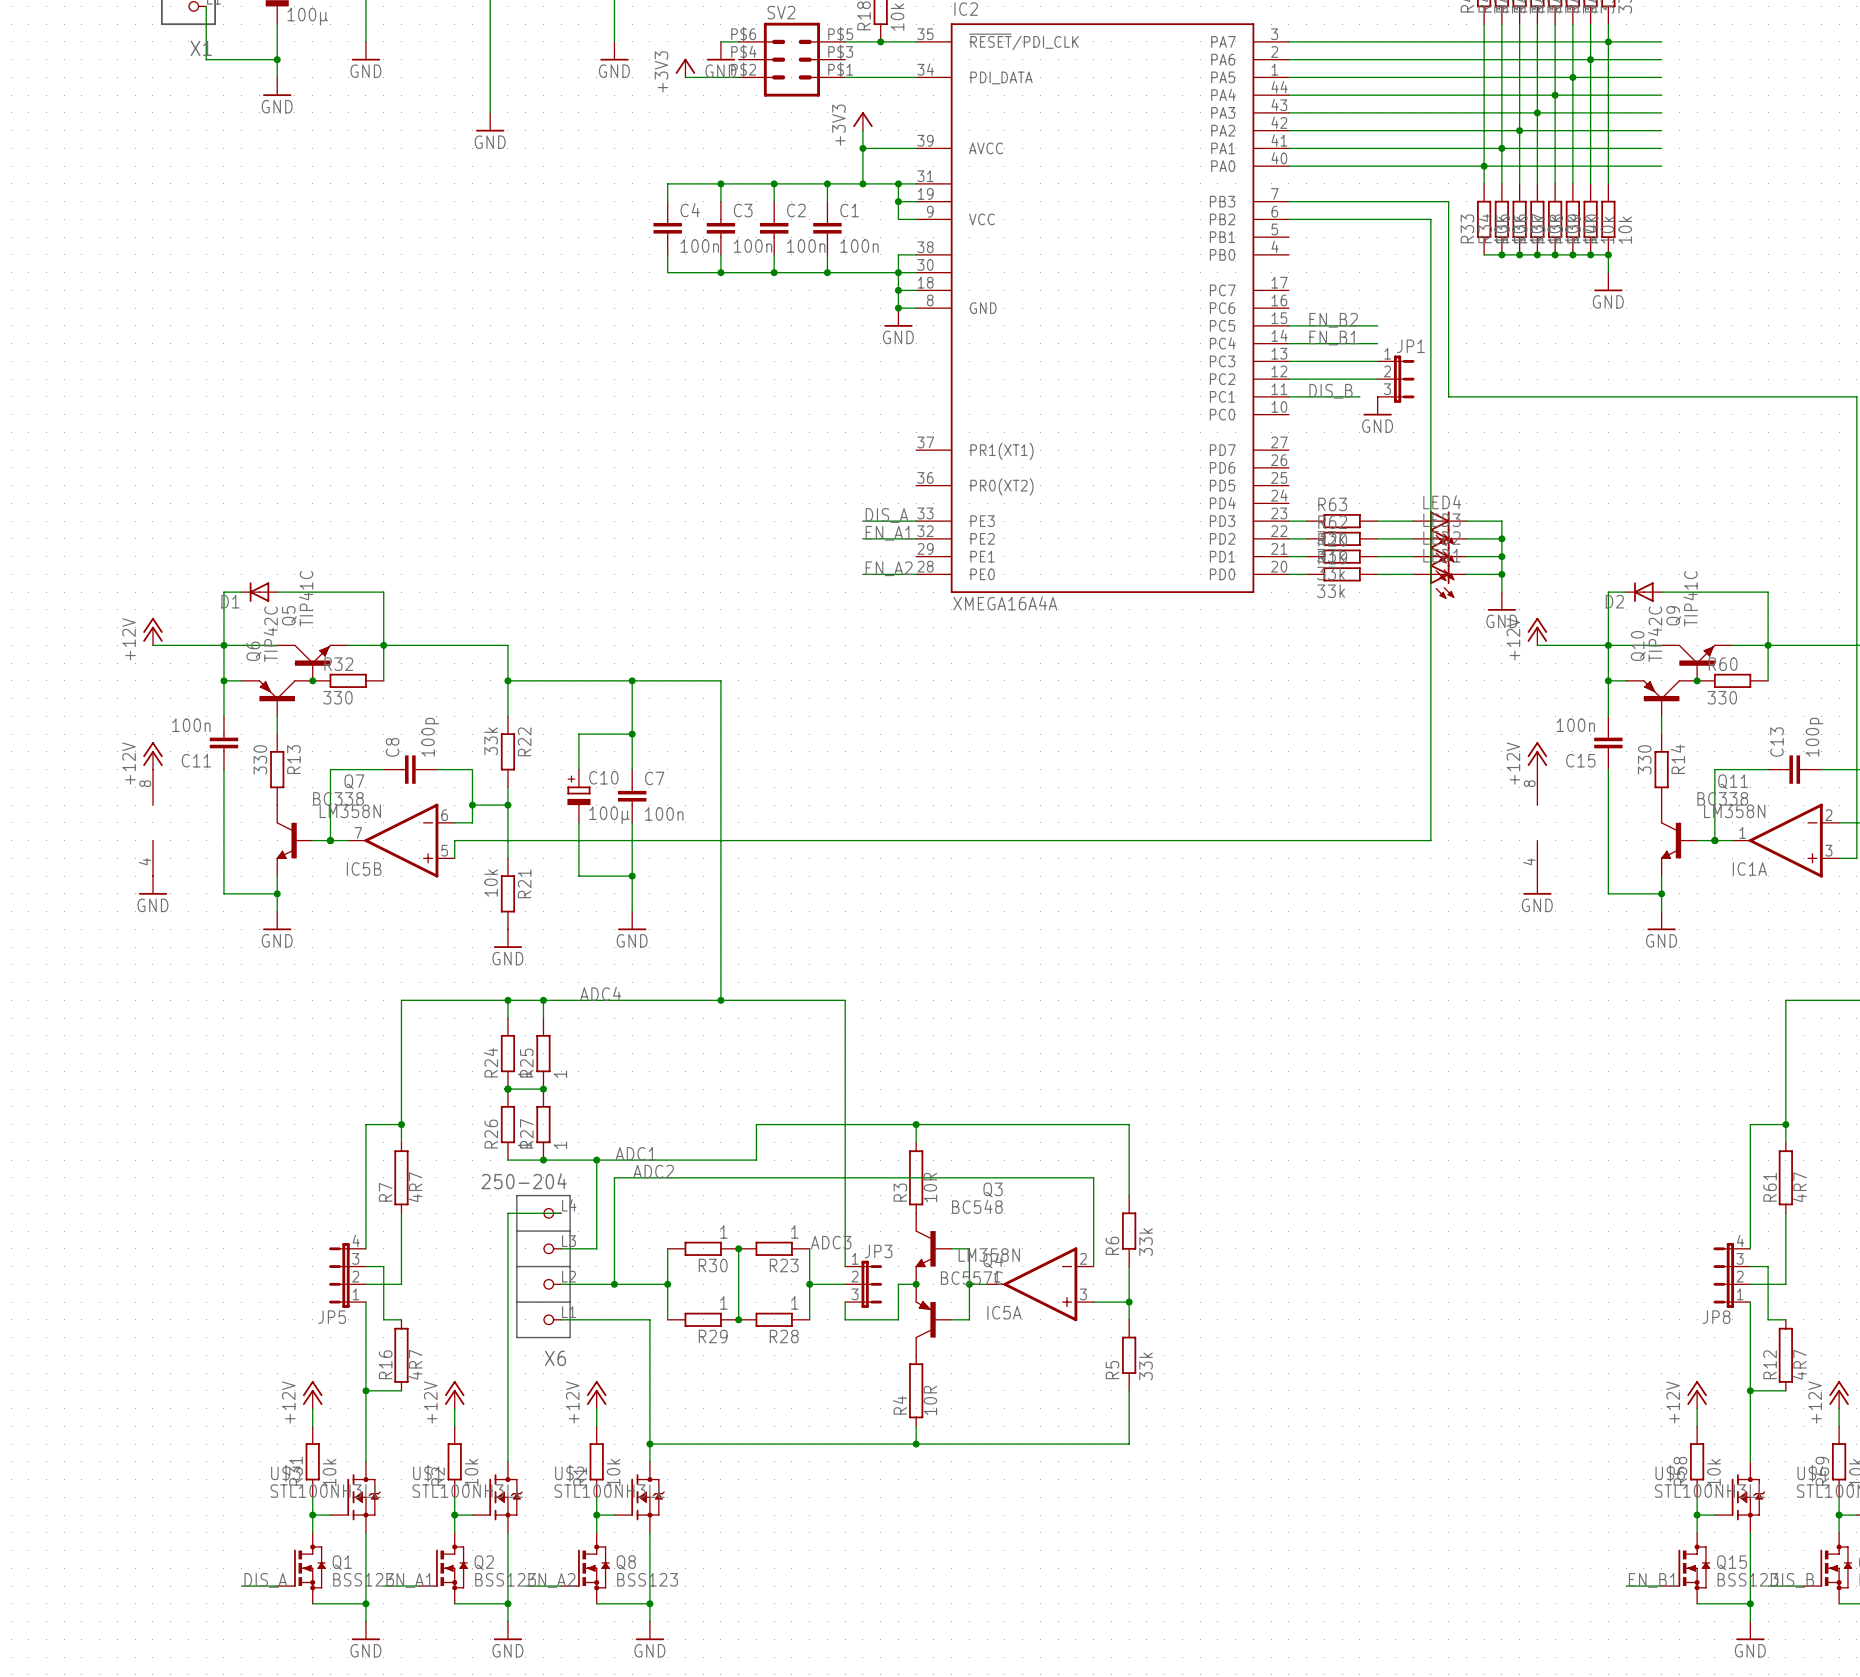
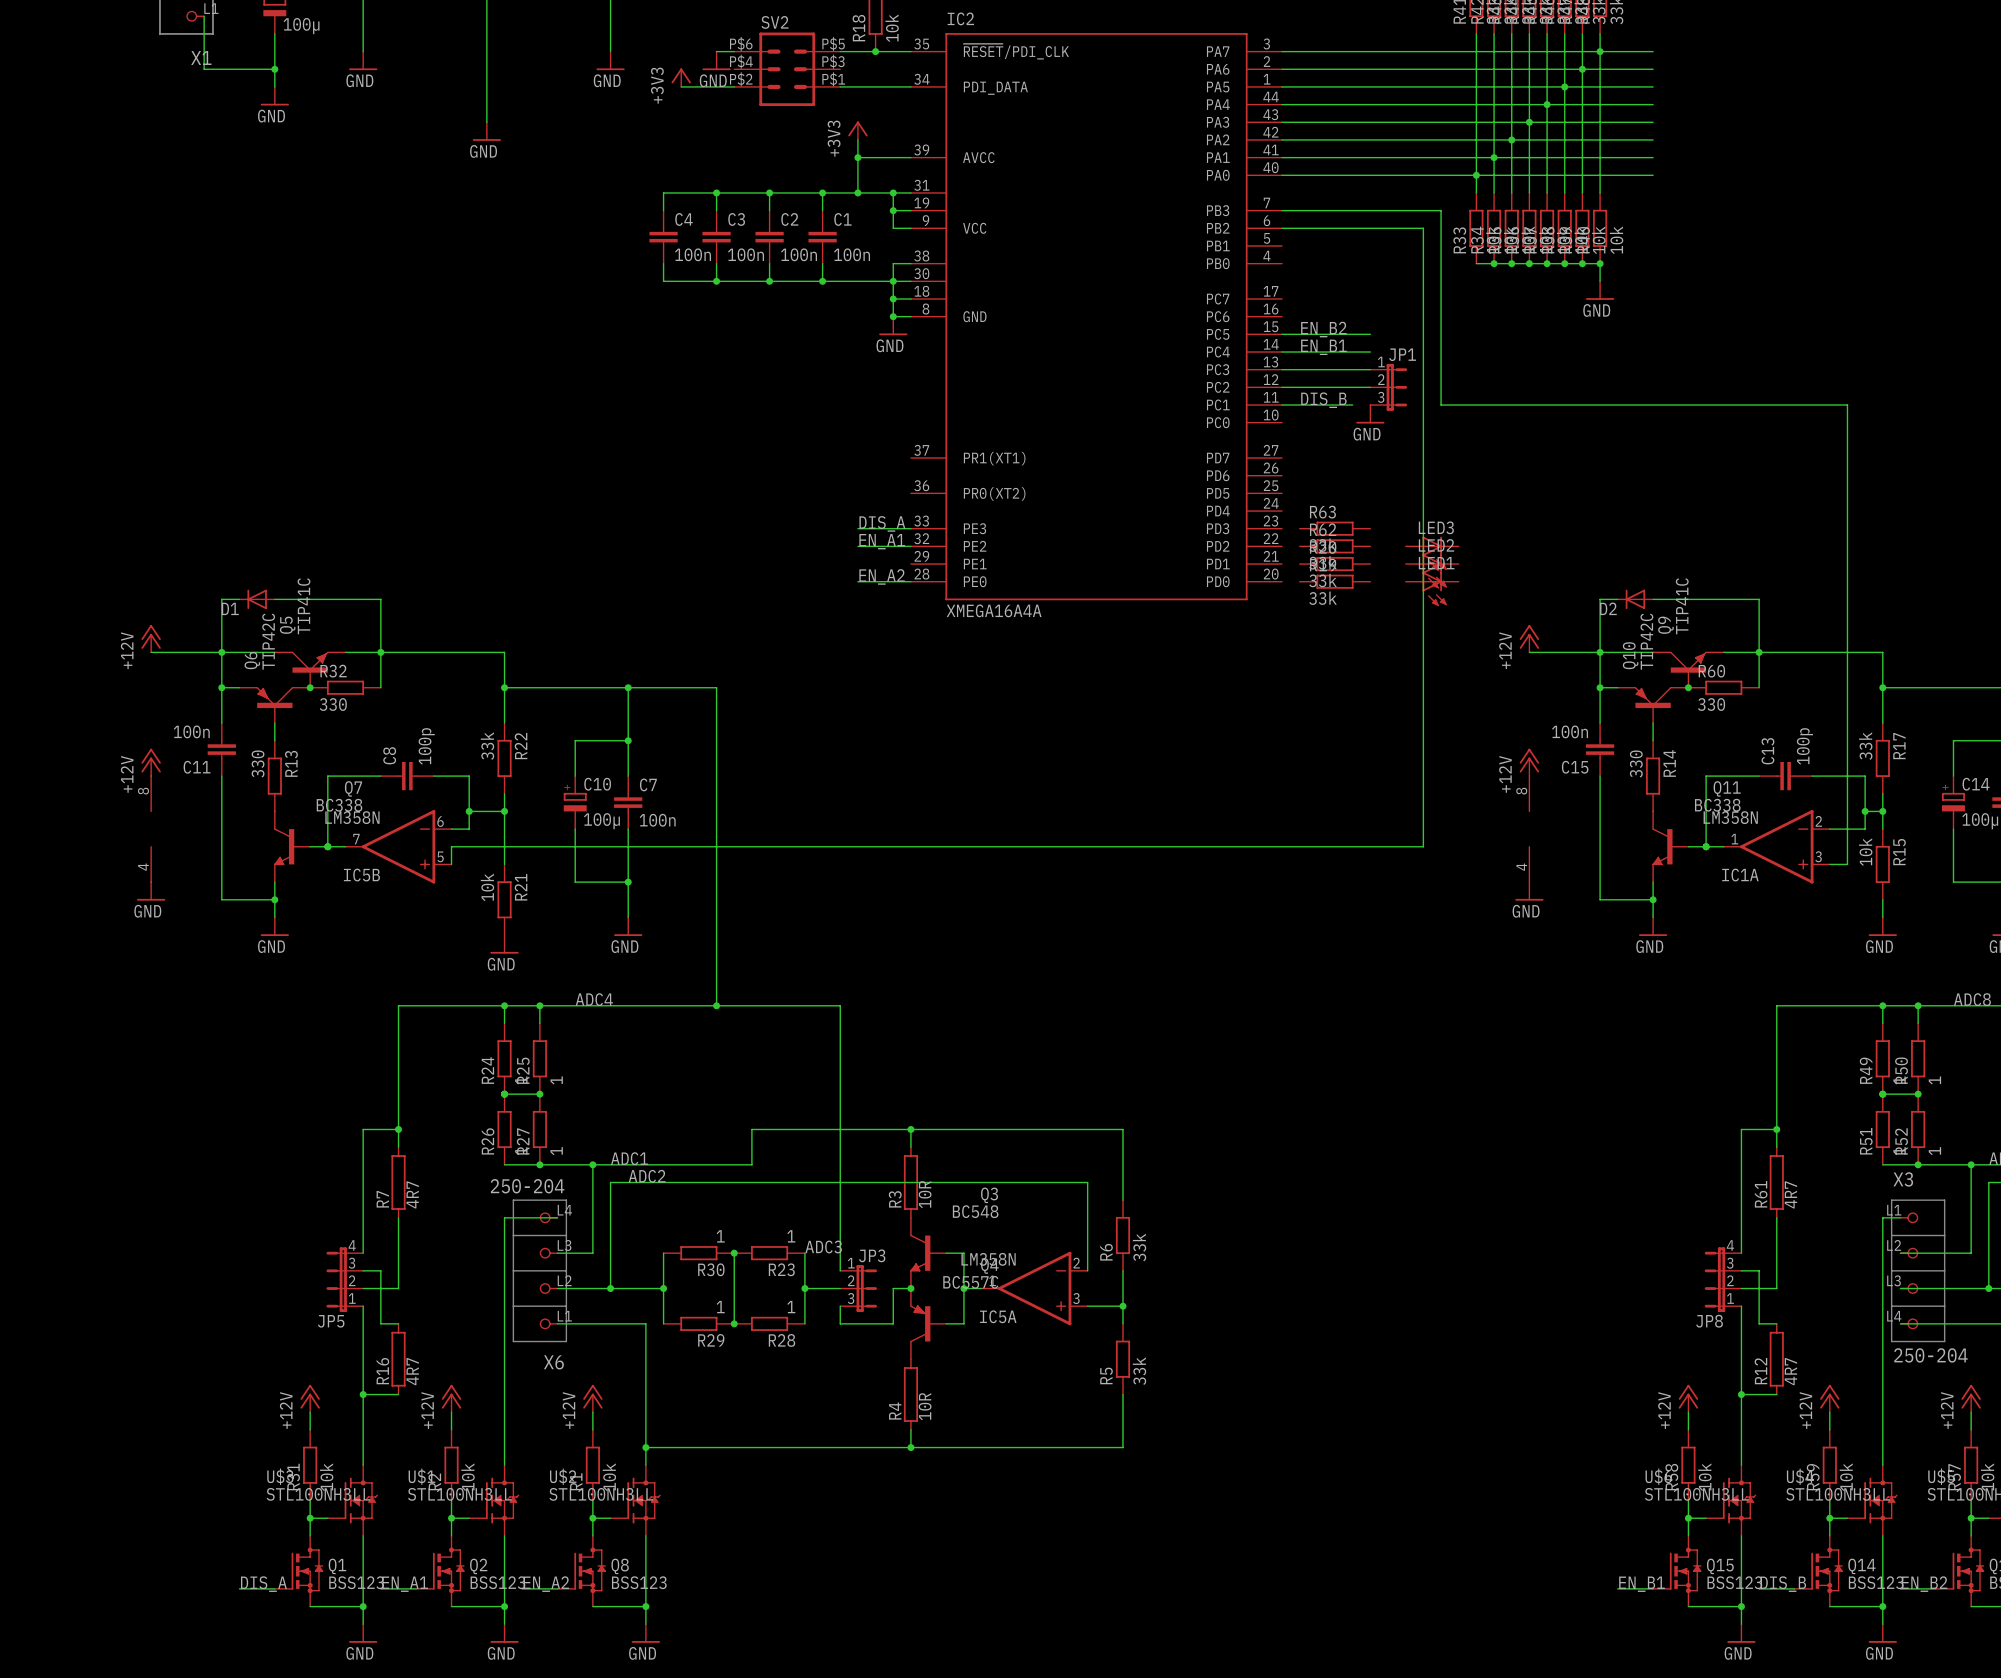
wire: (1288, 521) (1306, 521) -> none
wire: (1377, 521) (1413, 521) -> none
wire: (1466, 521) (1501, 521) (1501, 592) -> none
LED4: (1439, 528) -> none
wire: (1288, 538) (1306, 538) -> none
wire: (1377, 538) (1413, 538) -> none
wire: (1466, 538) (1501, 538) -> none
junction: (1501, 538) -> none
wire: (1288, 556) (1306, 556) -> none
wire: (1377, 556) (1413, 556) -> none
wire: (1466, 556) (1501, 556) -> none
junction: (1501, 556) -> none
wire: (1288, 574) (1306, 574) -> none
wire: (1377, 574) (1413, 574) -> none
wire: (1466, 574) (1501, 574) -> none
junction: (1501, 574) -> none
power symbol: GND (1501, 601) -> none

